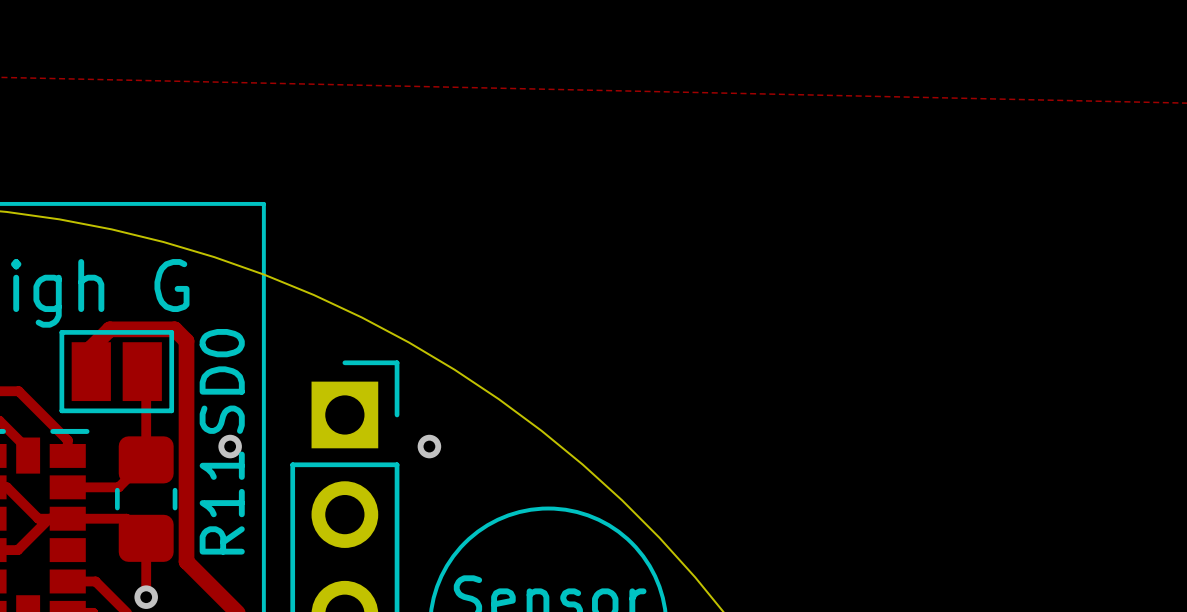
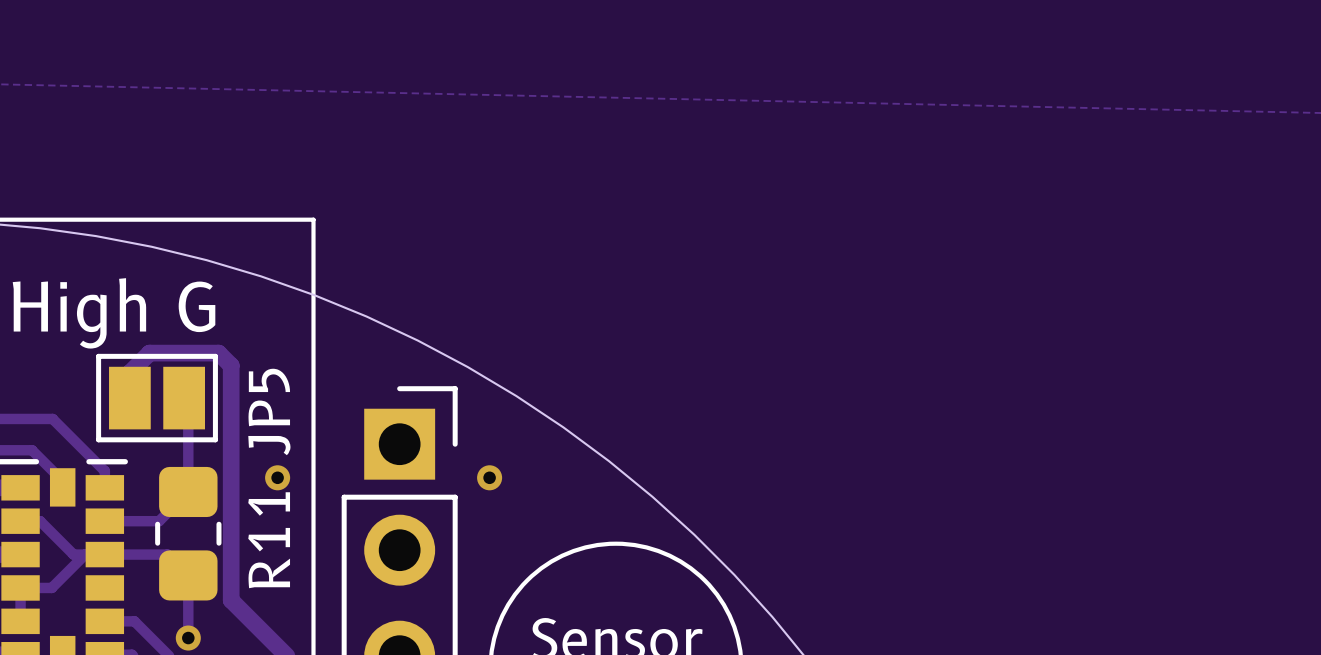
SD0 name: SD0 (222, 381) -> JP5 (269, 411)

